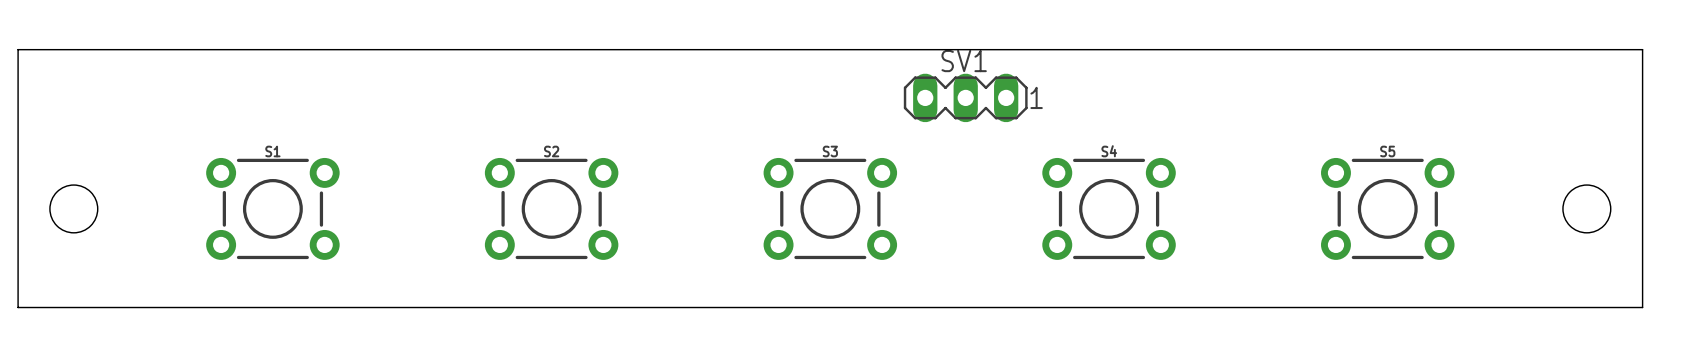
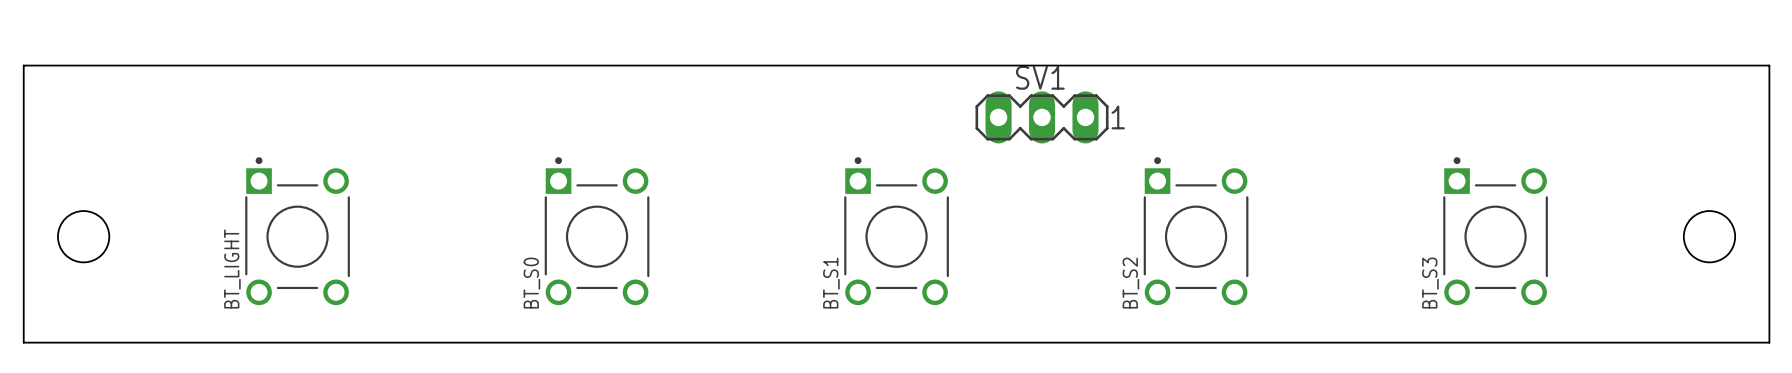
BT_LIGHT: none -> (297, 231)
BT_S0: none -> (597, 231)
BT_S1: none -> (896, 231)
BT_S2: none -> (1196, 231)
BT_S3: none -> (1495, 231)
S1: (272, 208) -> none
S2: (551, 208) -> none
S3: (830, 208) -> none
S4: (1109, 208) -> none
S5: (1387, 208) -> none

